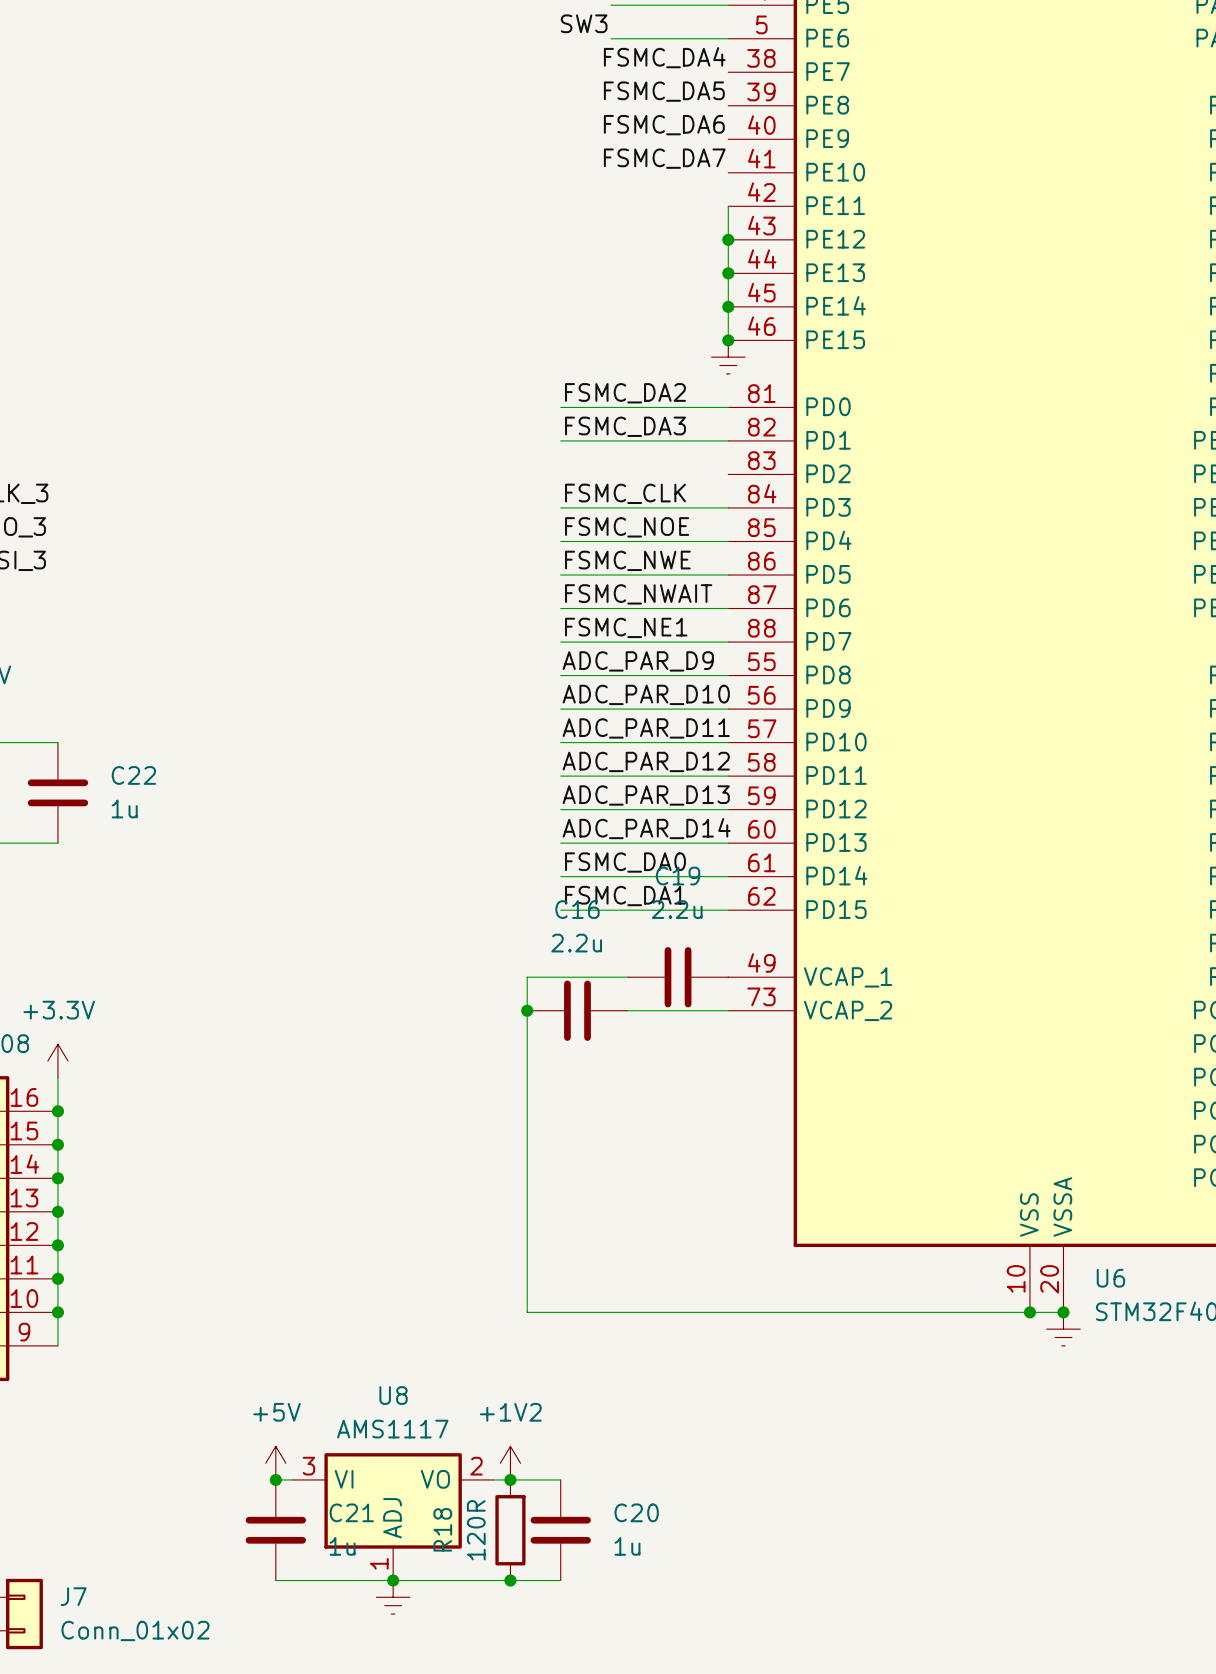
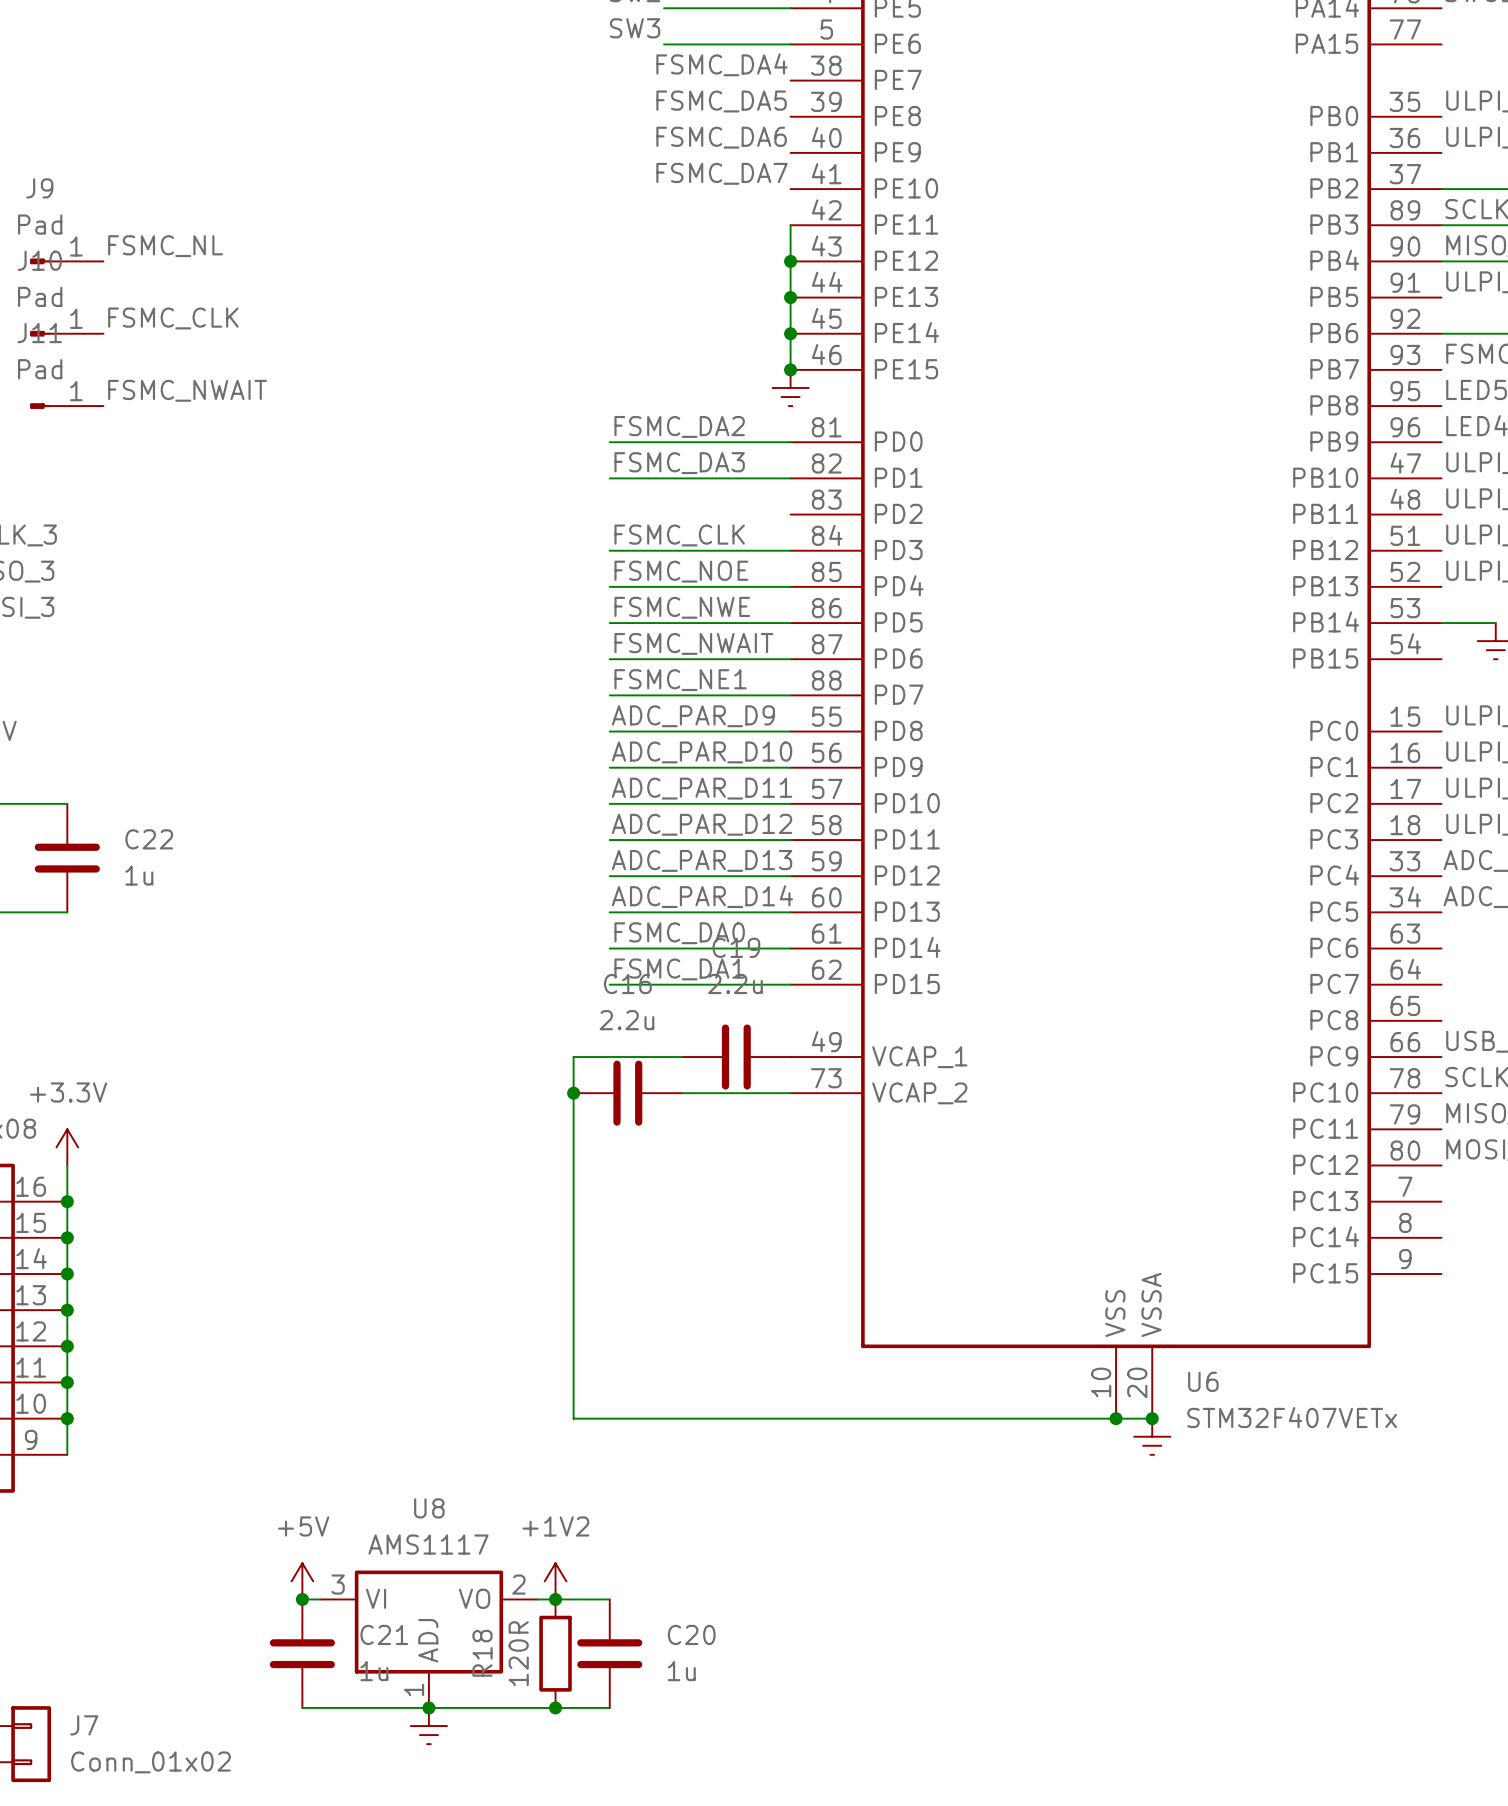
label: none -> FSMC_NL (165, 246)
J9: none -> Pad (66, 261)
label: none -> FSMC_CLK (173, 318)
J10: none -> Pad (66, 333)
label: none -> FSMC_NWAIT (187, 390)
J11: none -> Pad (66, 406)

